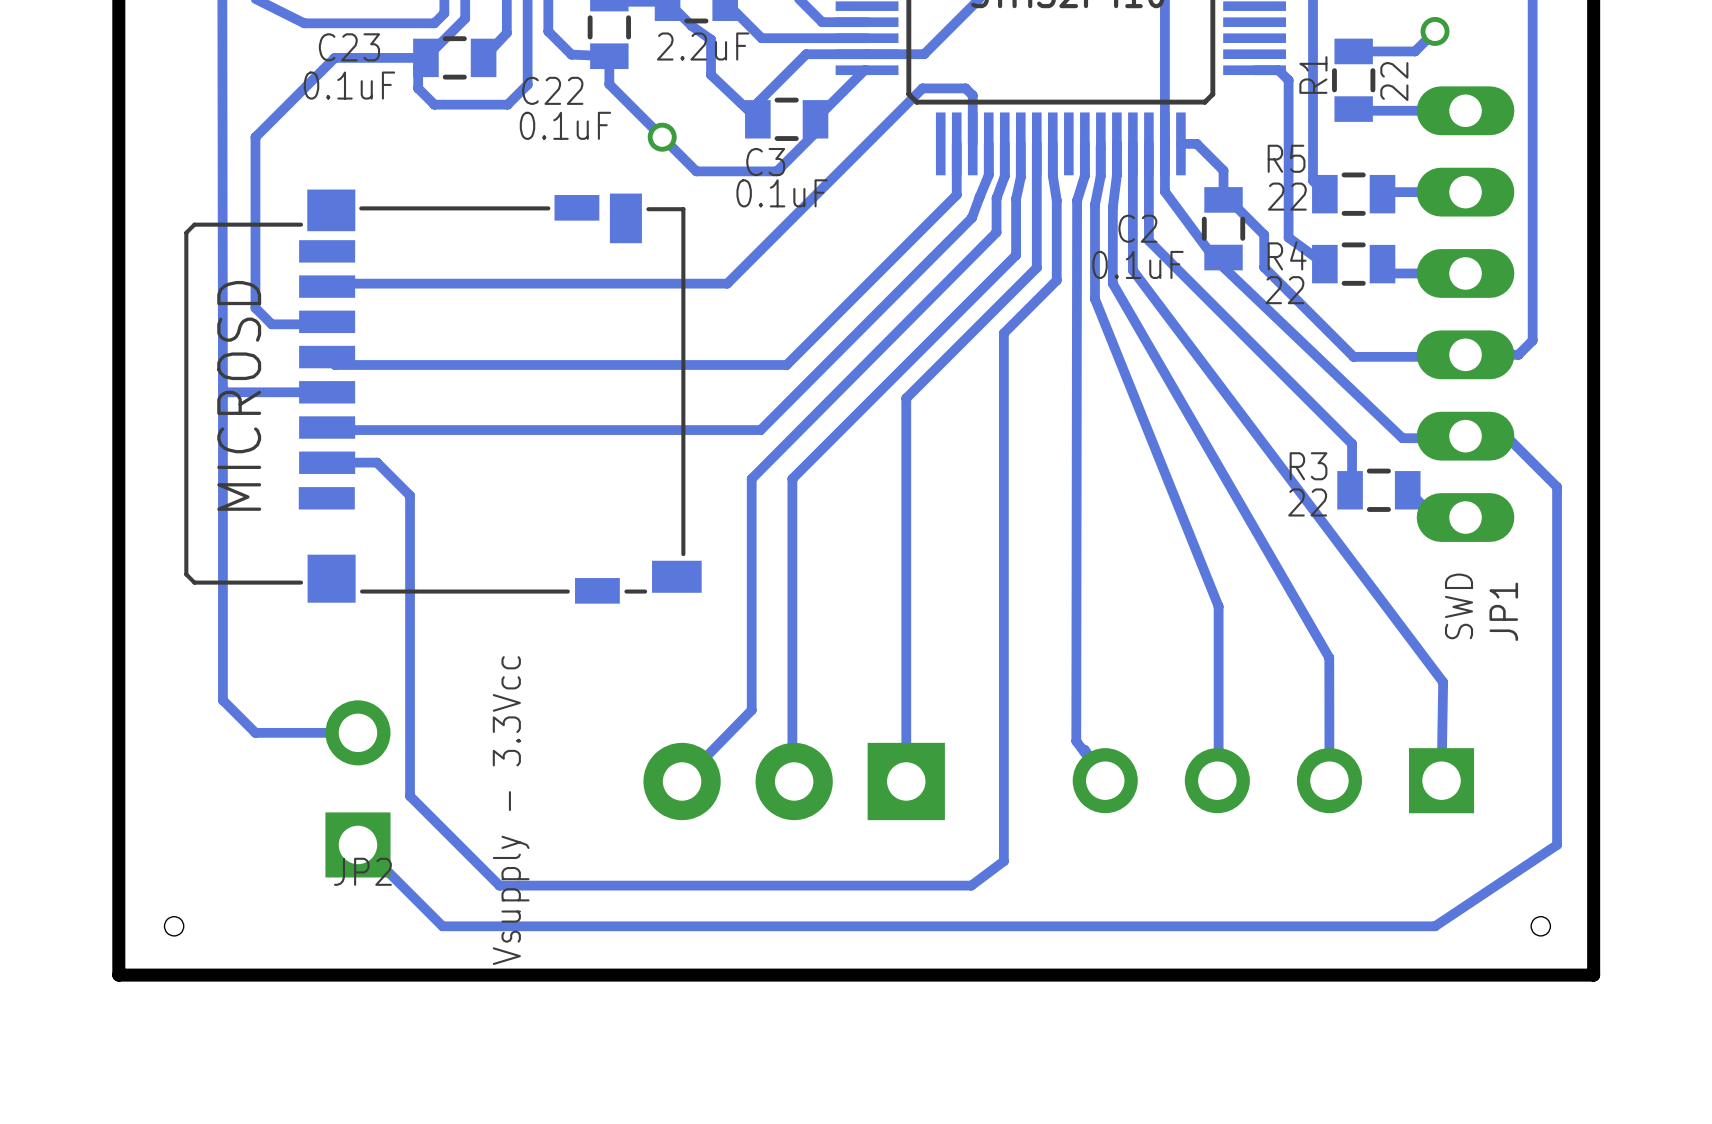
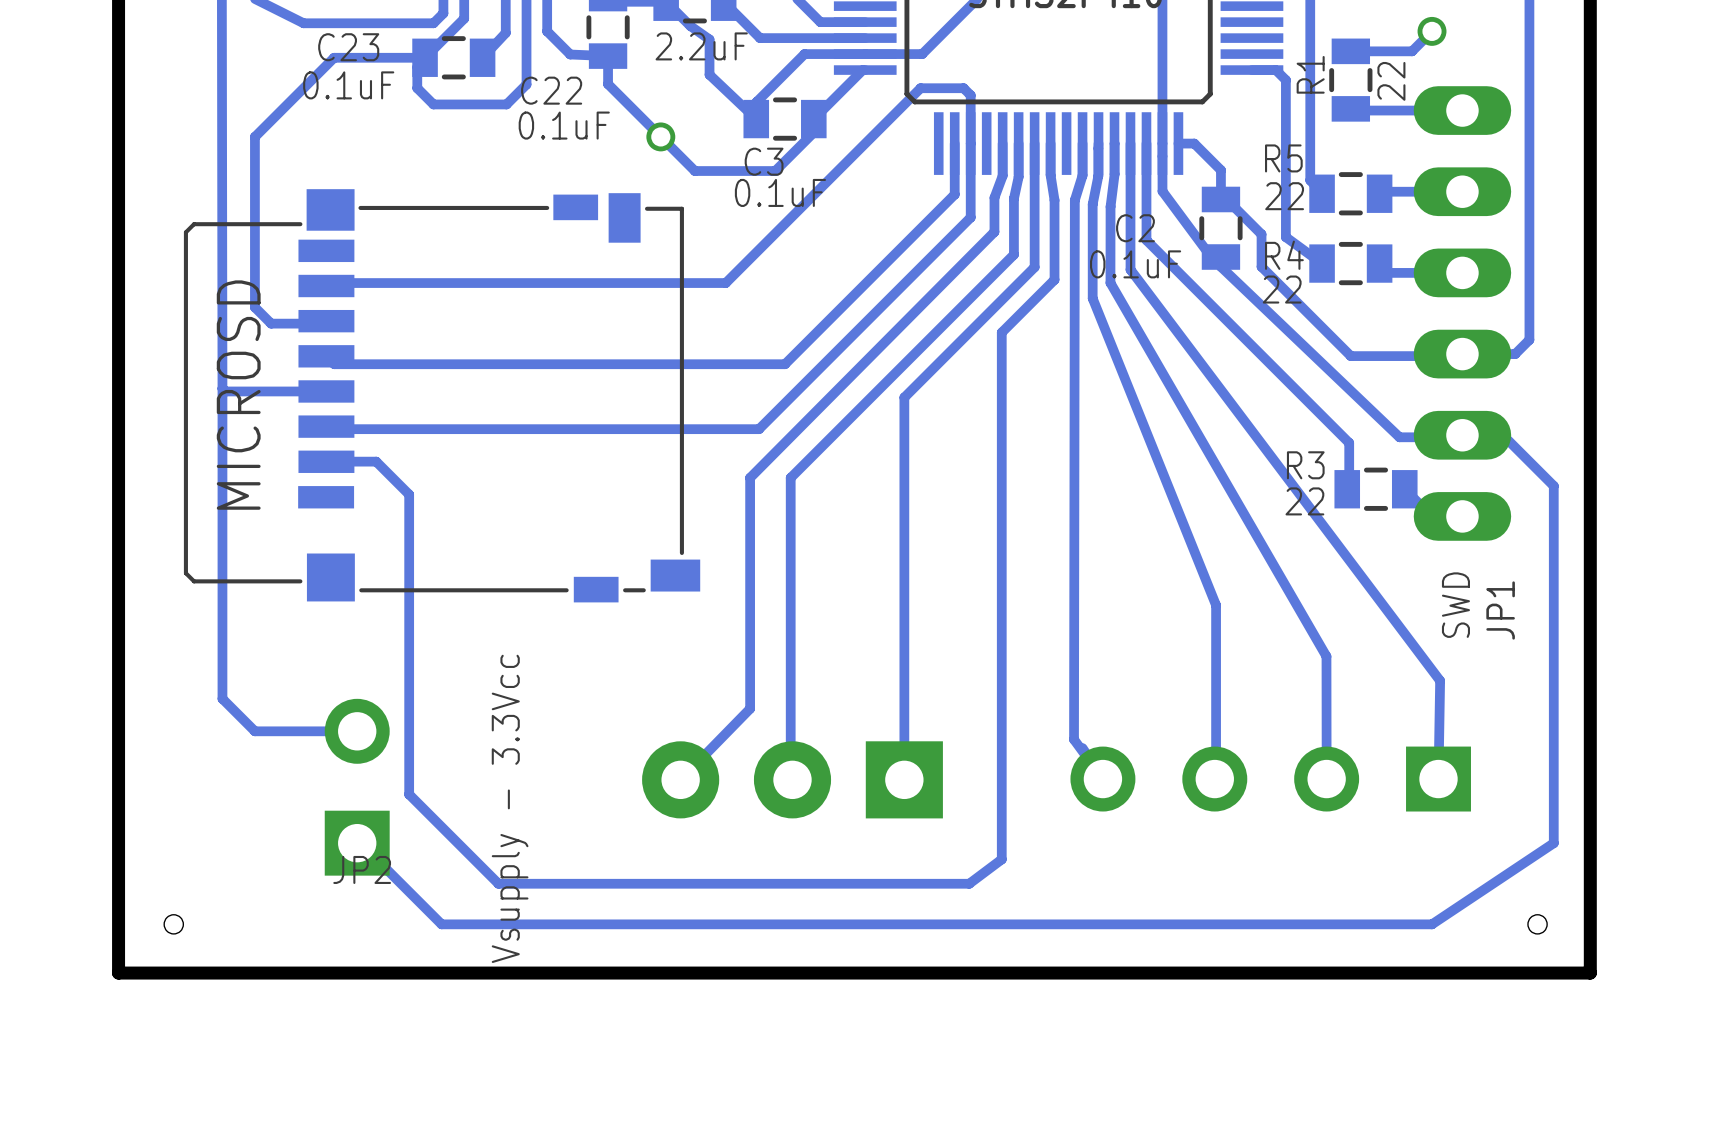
track: (988, 143) (988, 175) (972, 217) -> none
track: (971, 217) (760, 430) -> (970, 143) (970, 217) (759, 429)

